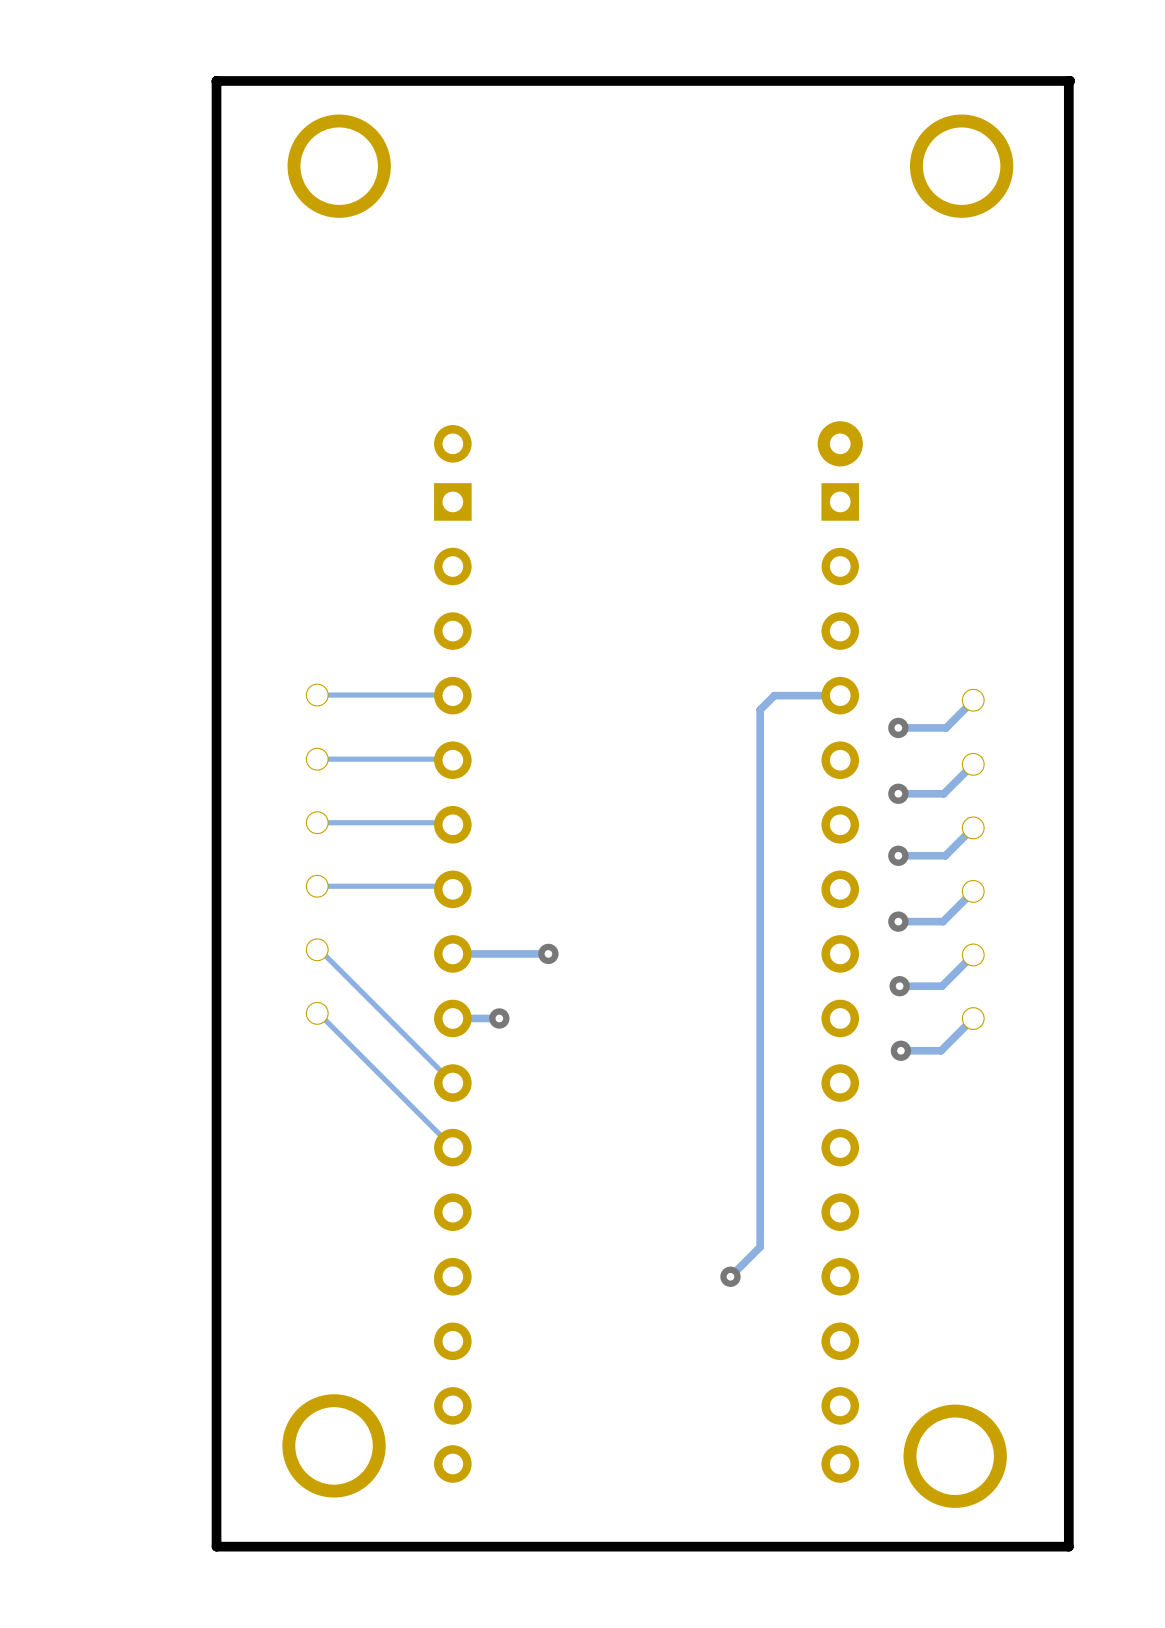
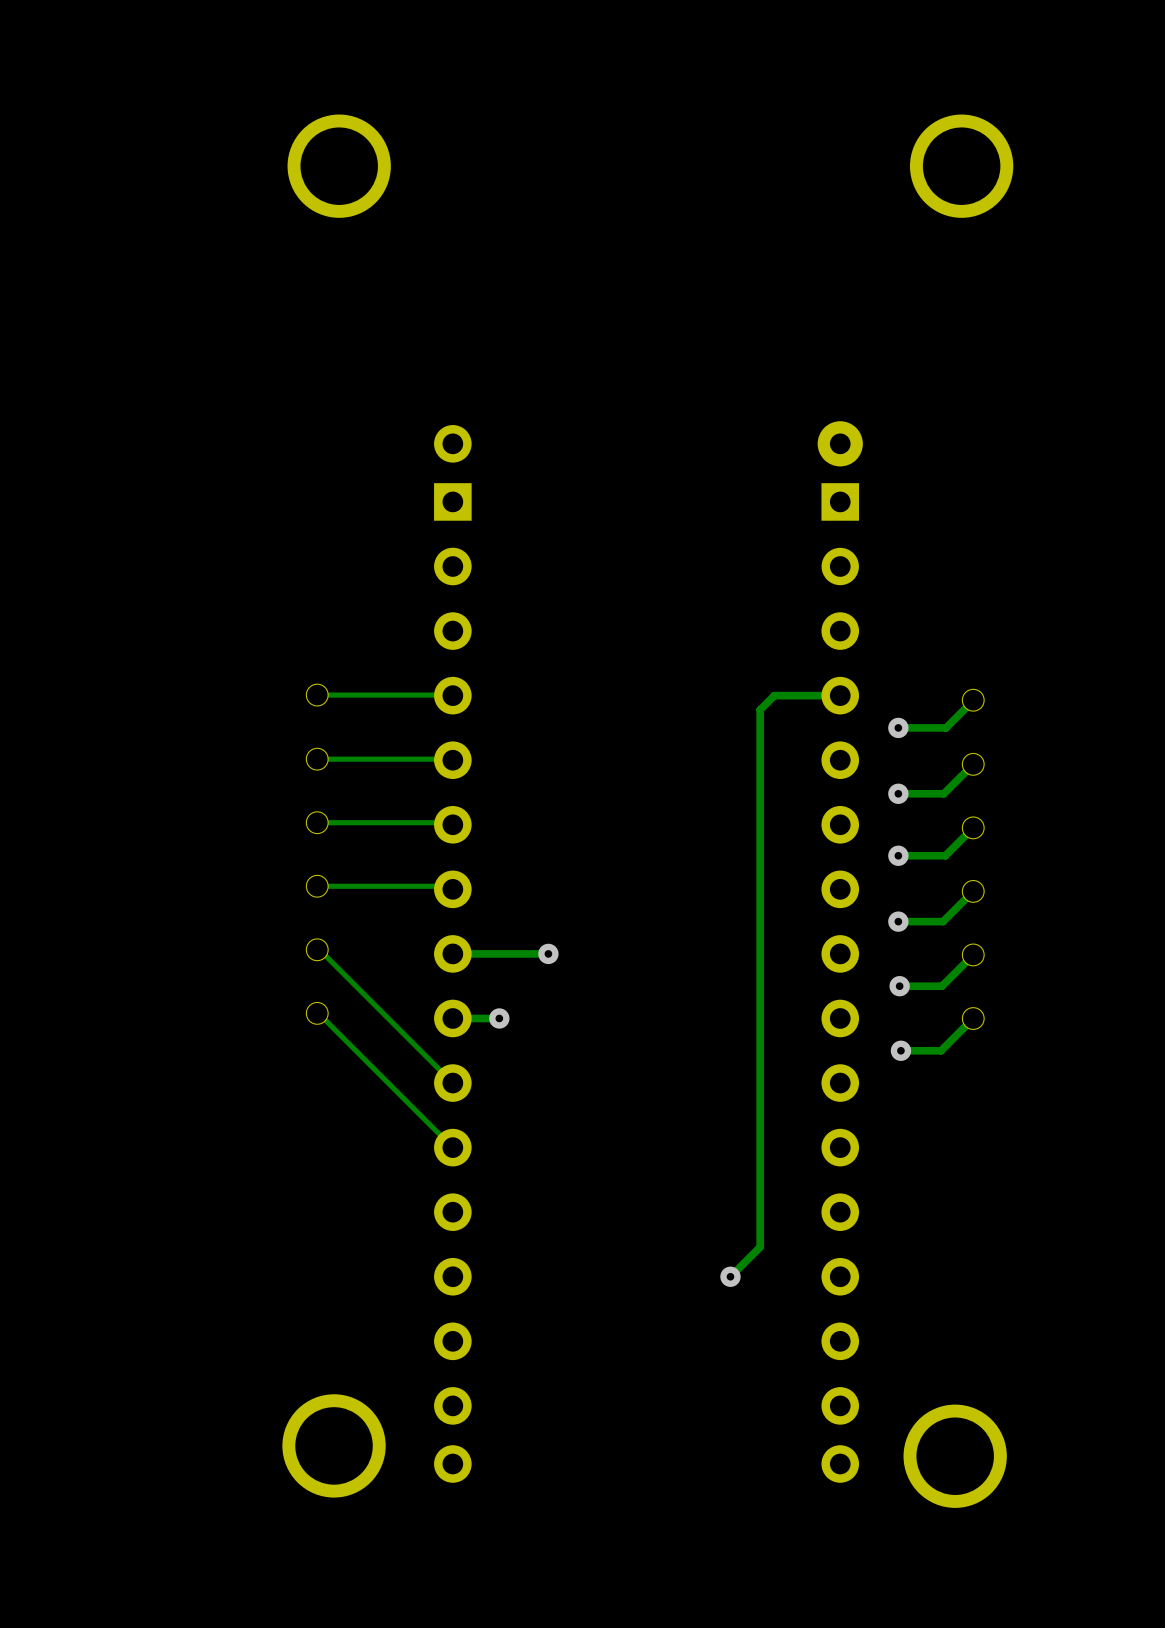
board edge: (1070, 80) (216, 80) (216, 1546) (1068, 1546) (1068, 80) -> none

